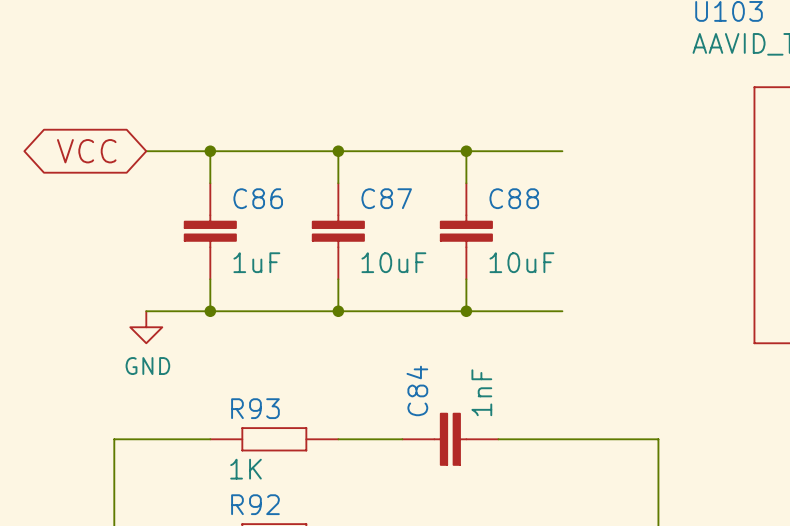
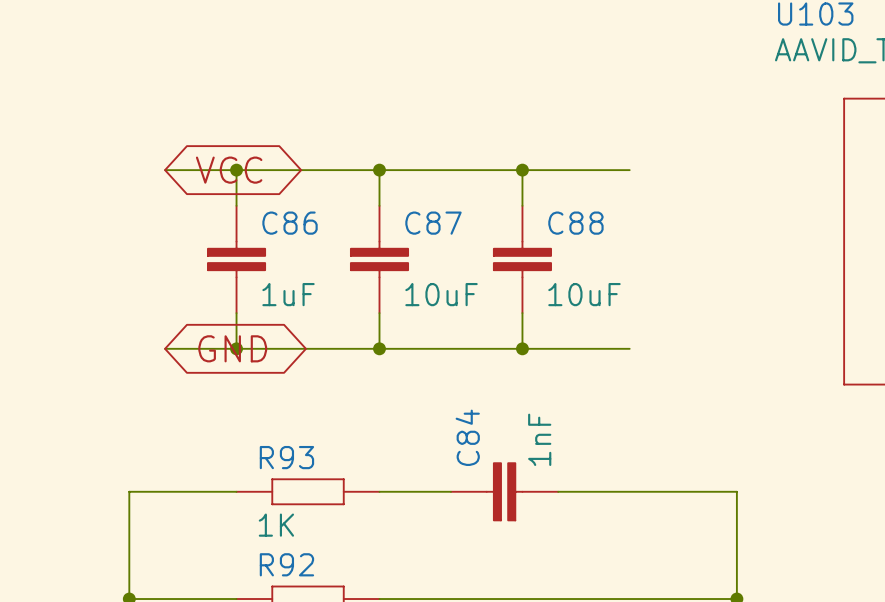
global label rotation: 0° (86, 151) -> 180° (229, 170)
global label: none -> GND (232, 348)
power symbol: GND (146, 327) -> none

